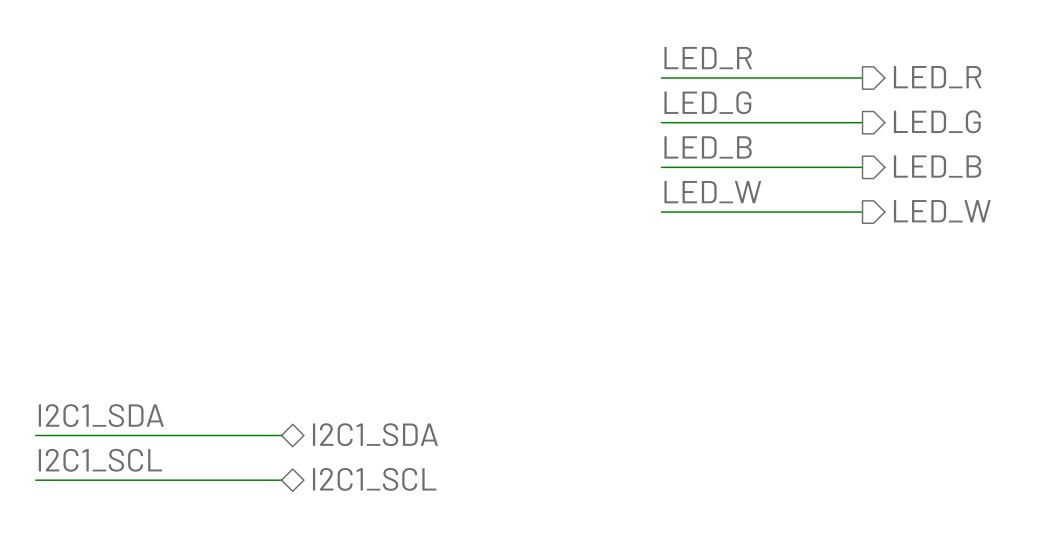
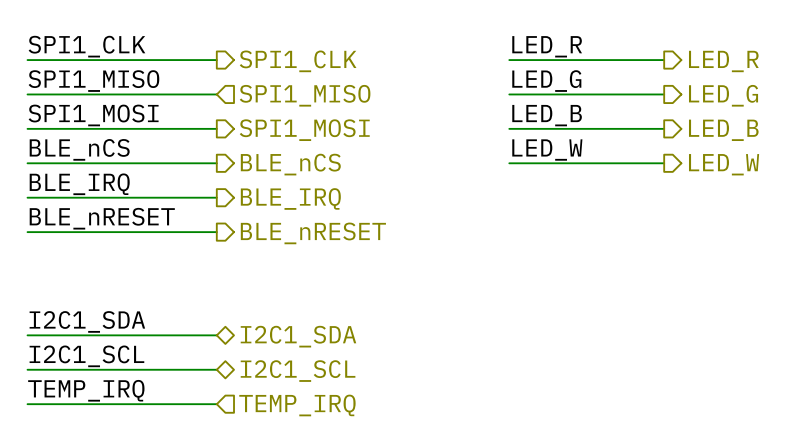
label: none -> SPI1_CLK (86, 46)
wire: none -> (27, 60) (216, 60)
hierarchical label: none -> SPI1_CLK (298, 61)
label: none -> SPI1_MISO (93, 81)
hierarchical label: none -> SPI1_MISO (305, 95)
wire: none -> (27, 94) (216, 94)
label: none -> SPI1_MOSI (93, 115)
hierarchical label: none -> SPI1_MOSI (304, 130)
wire: none -> (27, 128) (216, 128)
label: none -> BLE_nCS (79, 149)
hierarchical label: none -> BLE_nCS (290, 164)
wire: none -> (27, 163) (216, 163)
label: none -> BLE_IRQ (79, 184)
wire: none -> (27, 197) (216, 197)
hierarchical label: none -> BLE_IRQ (290, 199)
label: none -> BLE_nRESET (102, 218)
hierarchical label: none -> BLE_nRESET (313, 233)
wire: none -> (27, 232) (216, 232)
label: none -> TEMP_IRQ (86, 390)
wire: none -> (27, 404) (216, 404)
hierarchical label: none -> TEMP_IRQ (297, 405)

